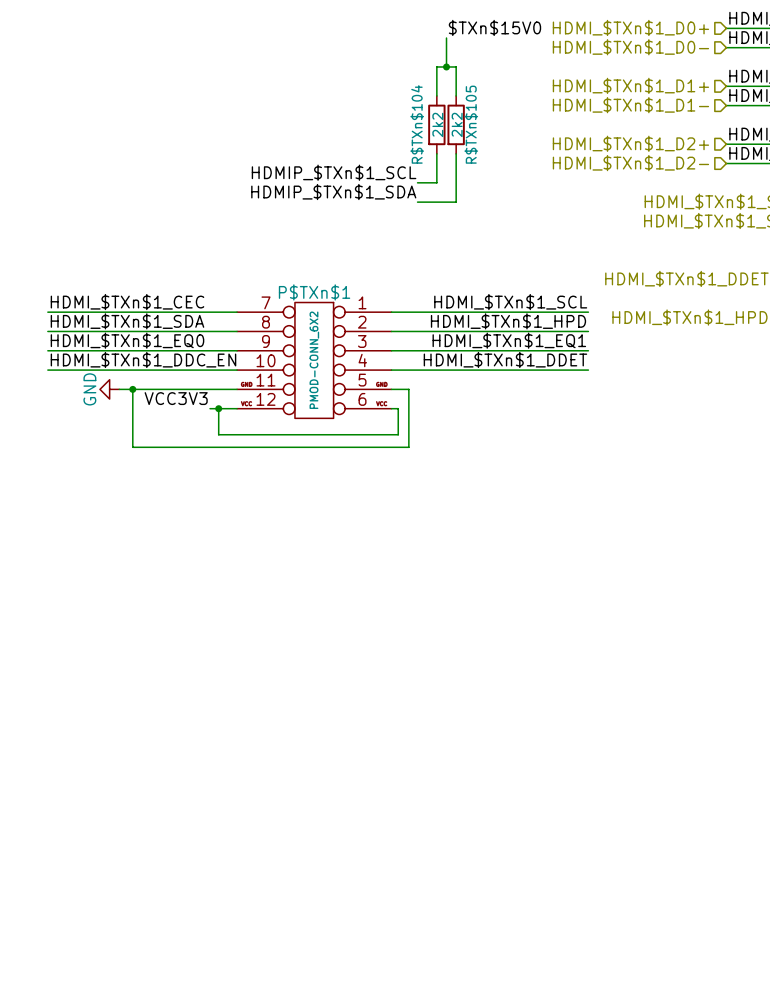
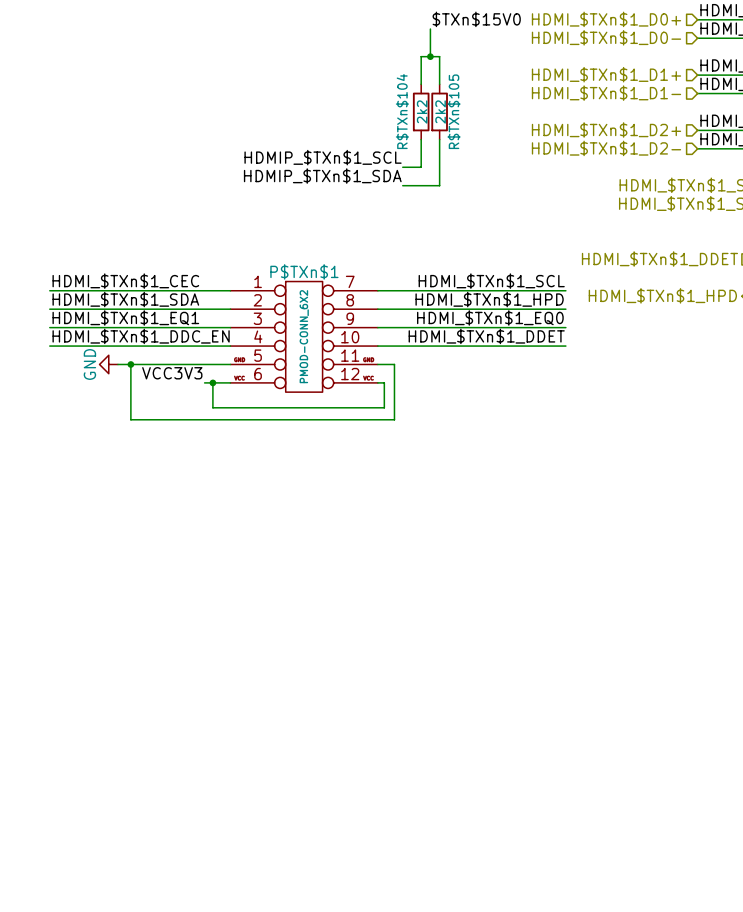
label: HDMI_$TXn$1_EQ0 (127, 340) -> HDMI_$TXn$1_EQ1 (125, 317)
label: HDMI_$TXn$1_EQ1 (509, 340) -> HDMI_$TXn$1_EQ0 (490, 317)
P$TXn$1 flip: as is (314, 360) -> left-right (304, 336)

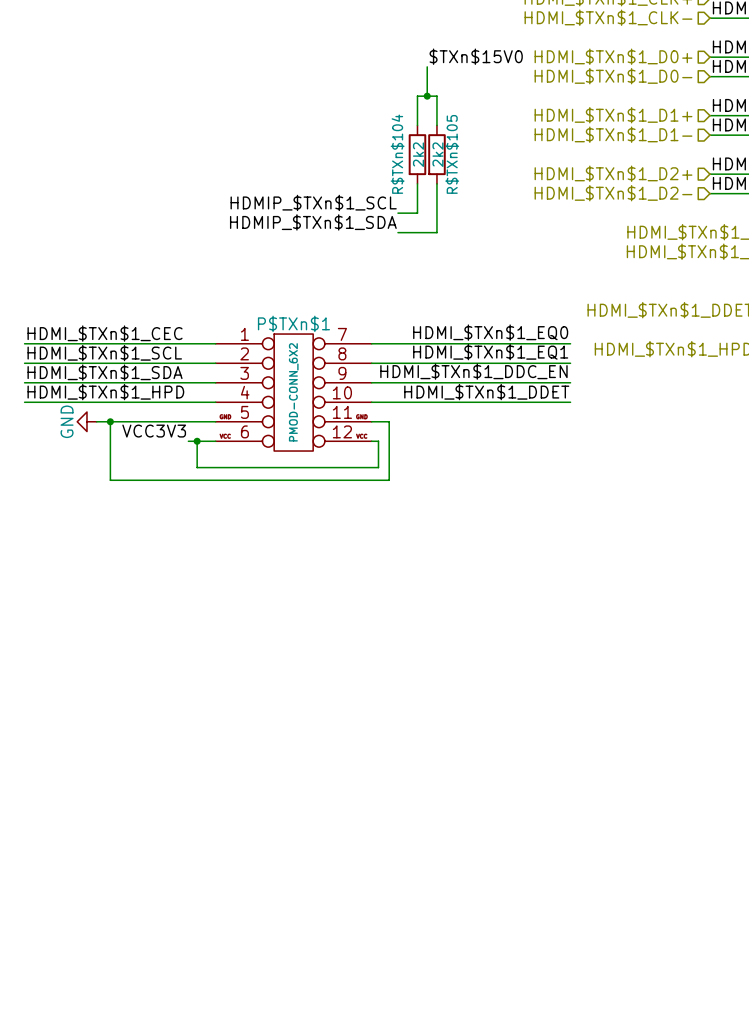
label: HDMI_$TXn$1_SCL (491, 281) -> none
label: HDMI_$TXn$1_SDA (125, 299) -> HDMI_$TXn$1_SCL (104, 353)
label: HDMI_$TXn$1_HPD (489, 299) -> HDMI_$TXn$1_EQ1 (490, 352)
label: HDMI_$TXn$1_EQ1 (125, 317) -> HDMI_$TXn$1_SDA (105, 372)
label: none -> HDMI_$TXn$1_DDC_EN (473, 371)
label position: HDMI_$TXn$1_EQ0 (490, 317) -> HDMI_$TXn$1_EQ0 (490, 332)
label: HDMI_$TXn$1_DDC_EN (141, 336) -> HDMI_$TXn$1_HPD (105, 392)

